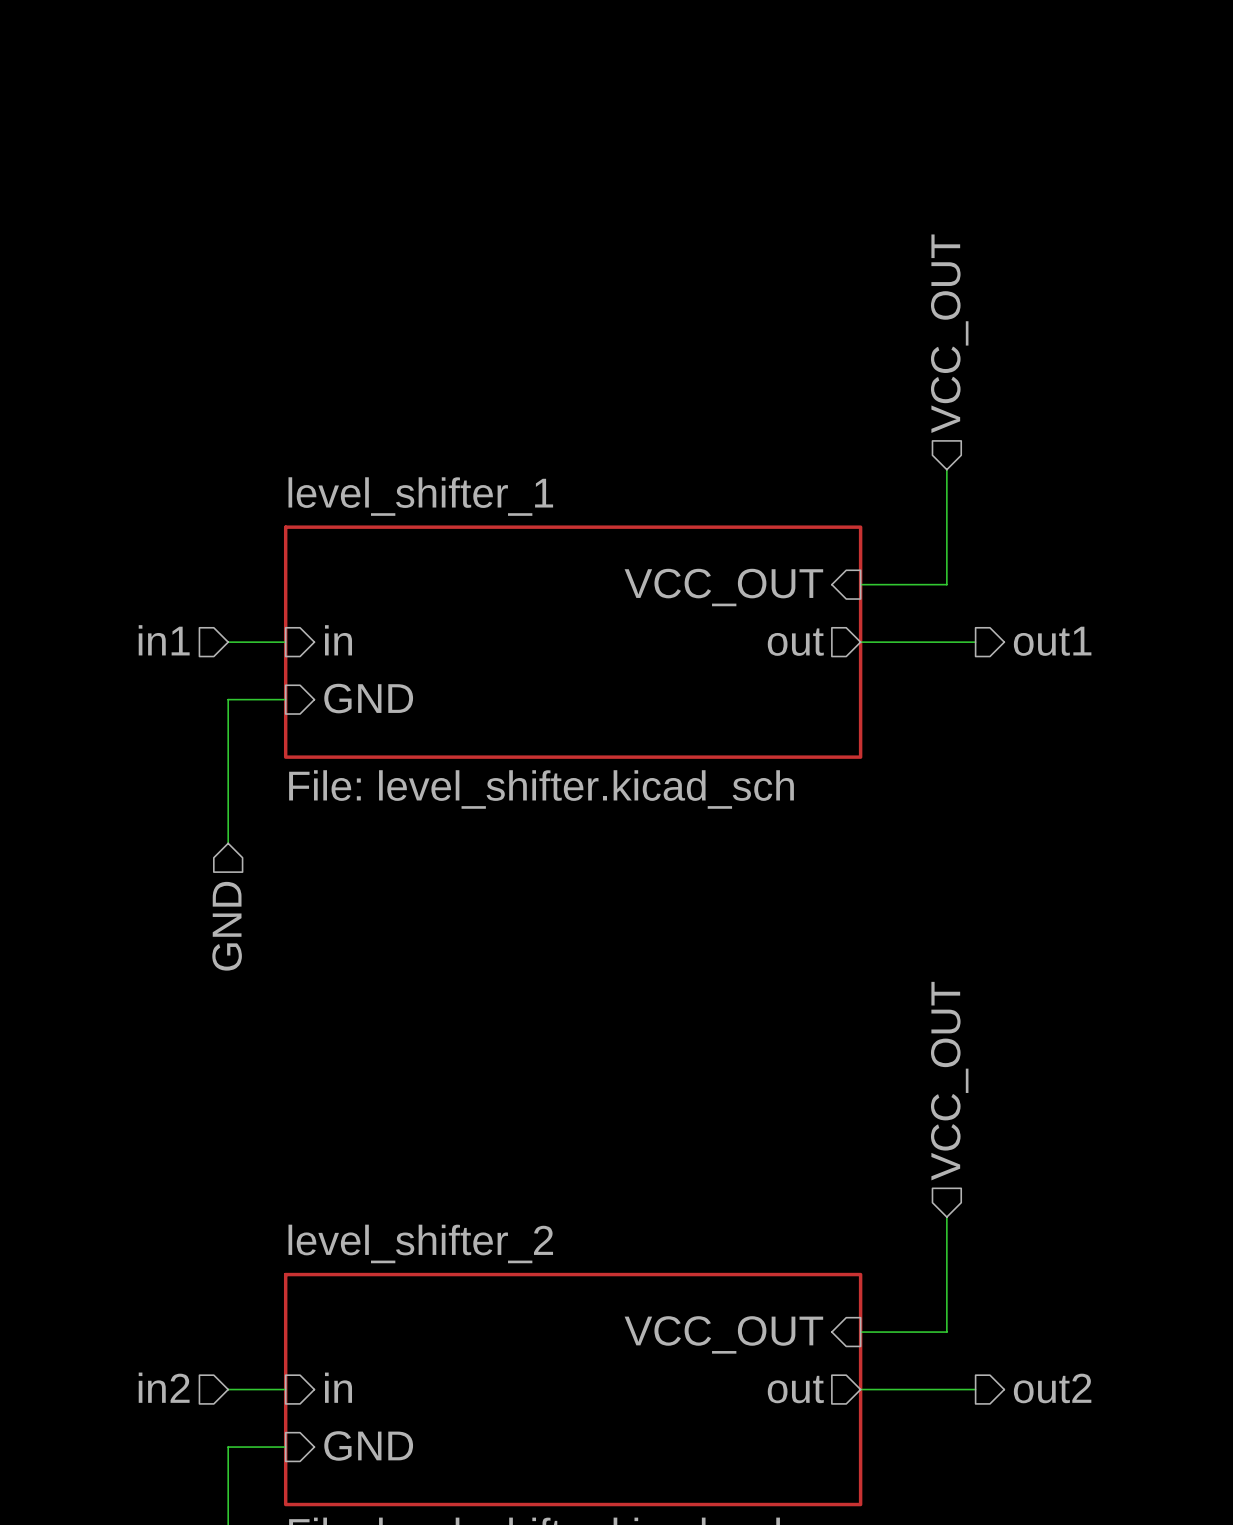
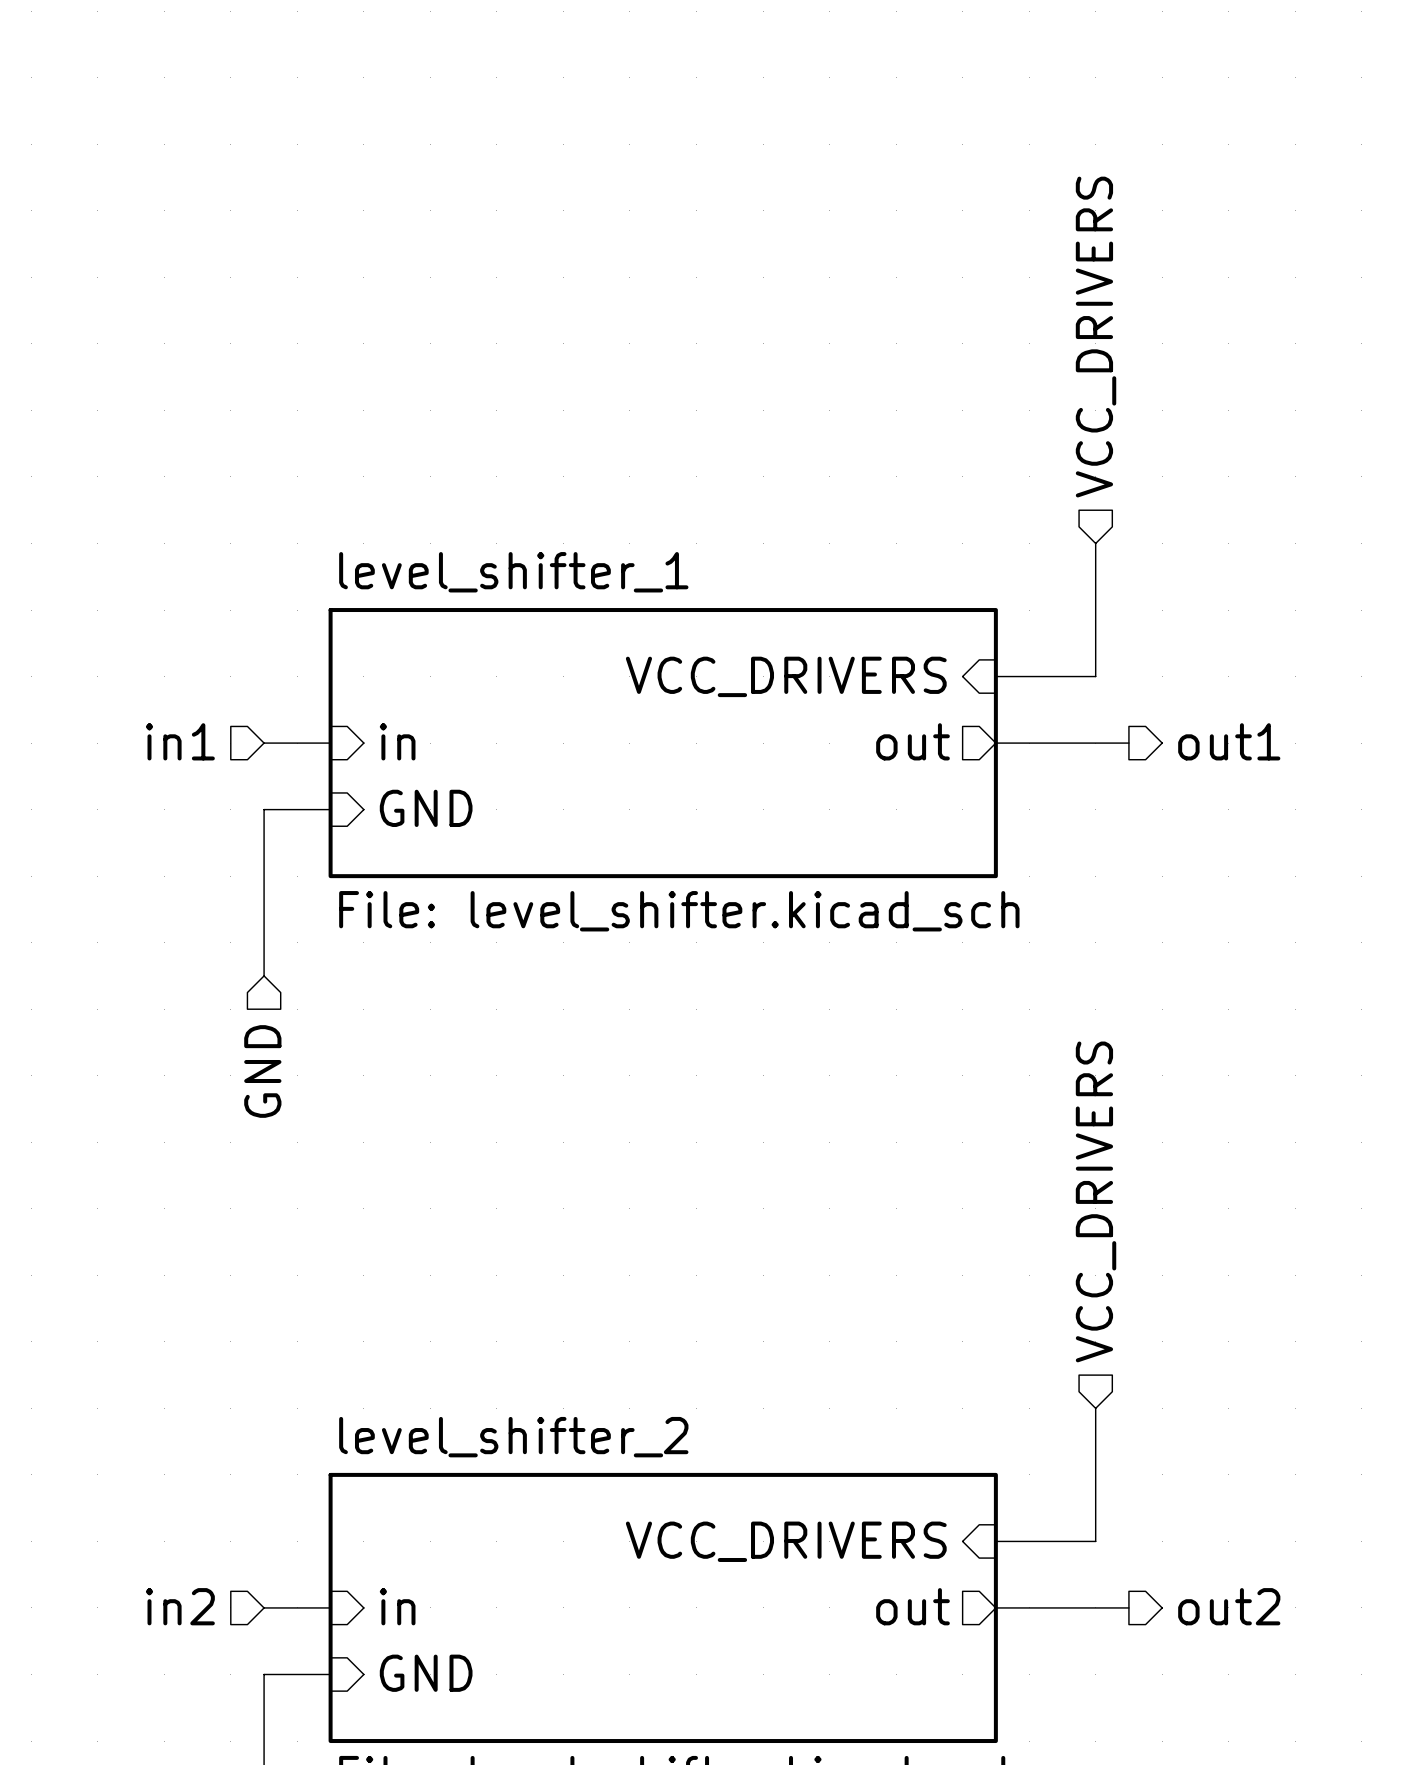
hierarchical label: VCC_OUT (949, 333) -> VCC_DRIVERS (1096, 337)
sheet pin: VCC_OUT (723, 587) -> VCC_DRIVERS (786, 676)
hierarchical label: VCC_OUT (949, 1081) -> VCC_DRIVERS (1096, 1201)
sheet pin: VCC_OUT (723, 1334) -> VCC_DRIVERS (786, 1541)

